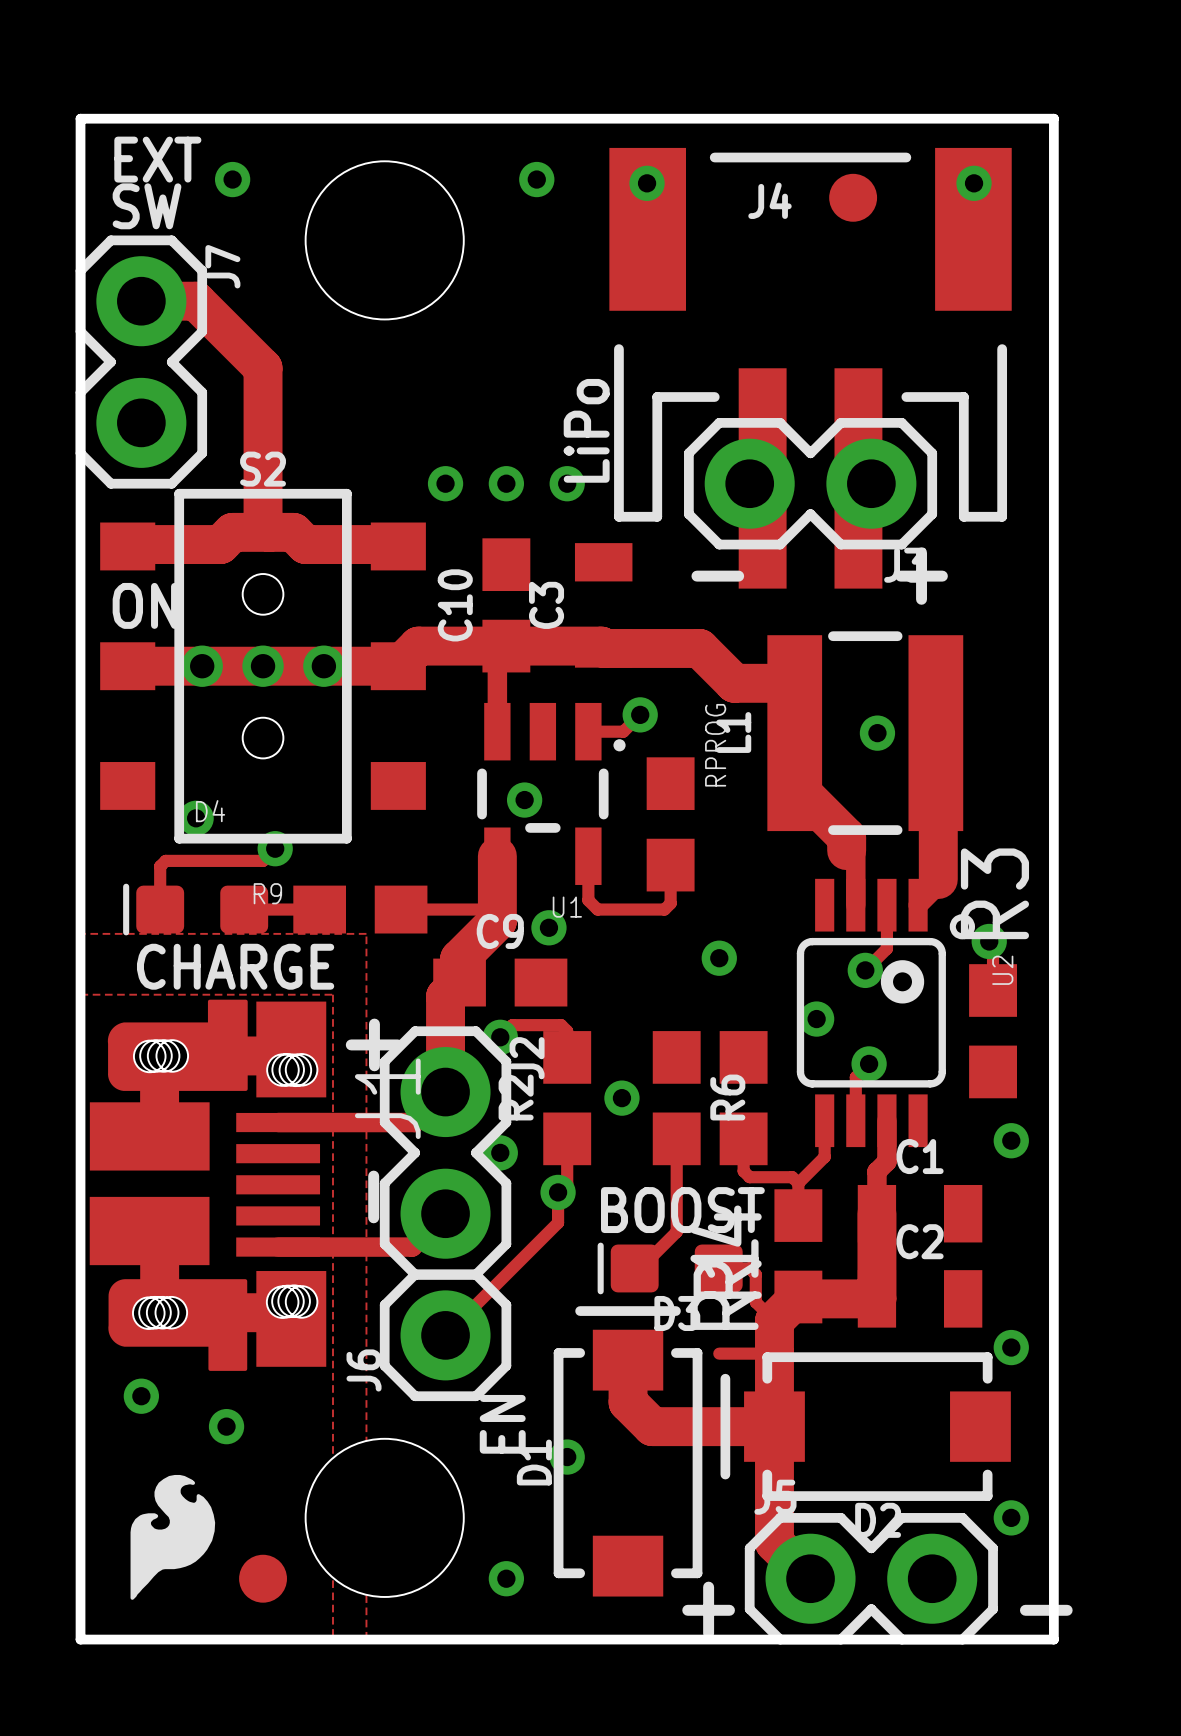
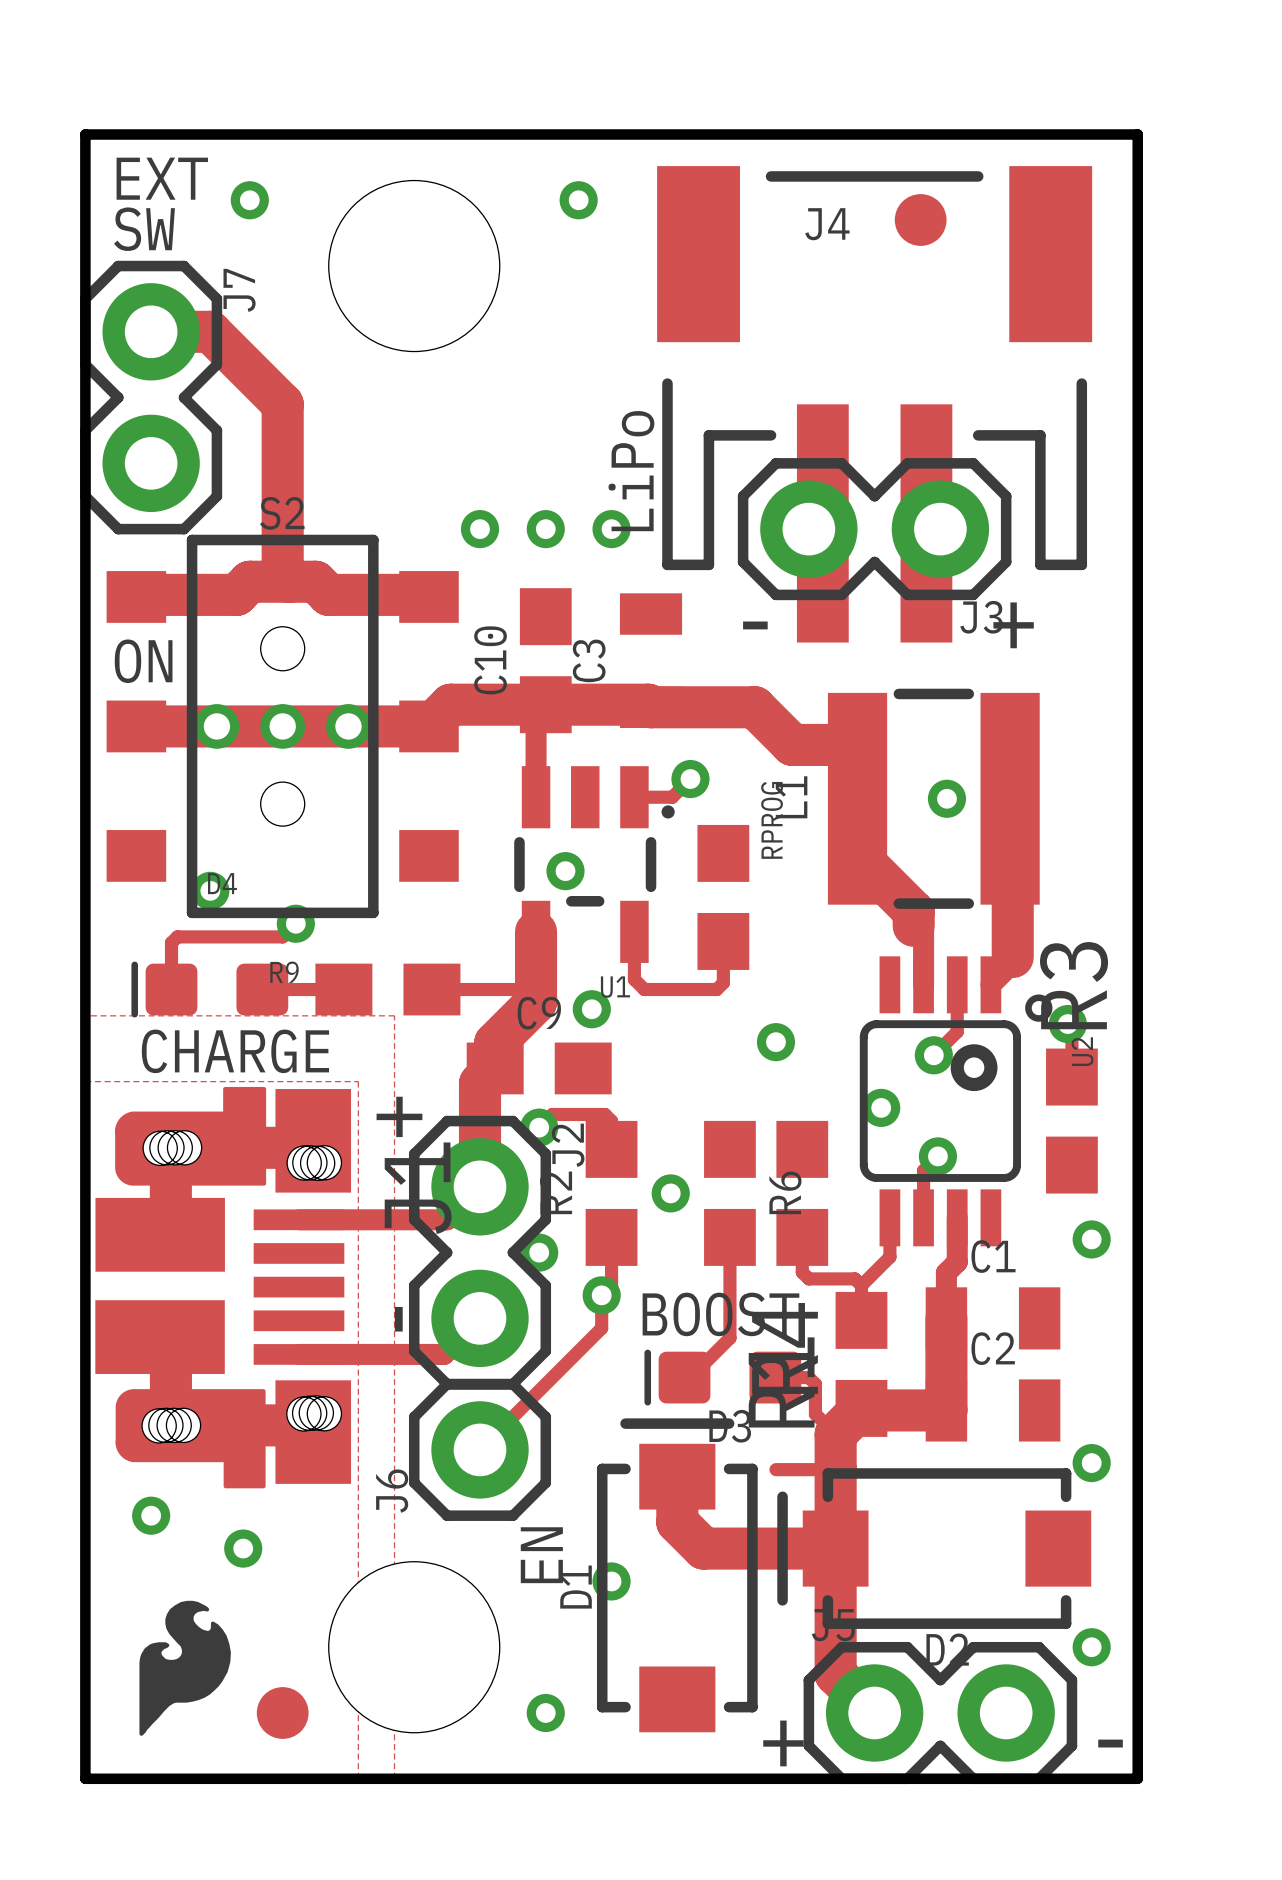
via: (647, 183) -> none
via: (974, 183) -> none

